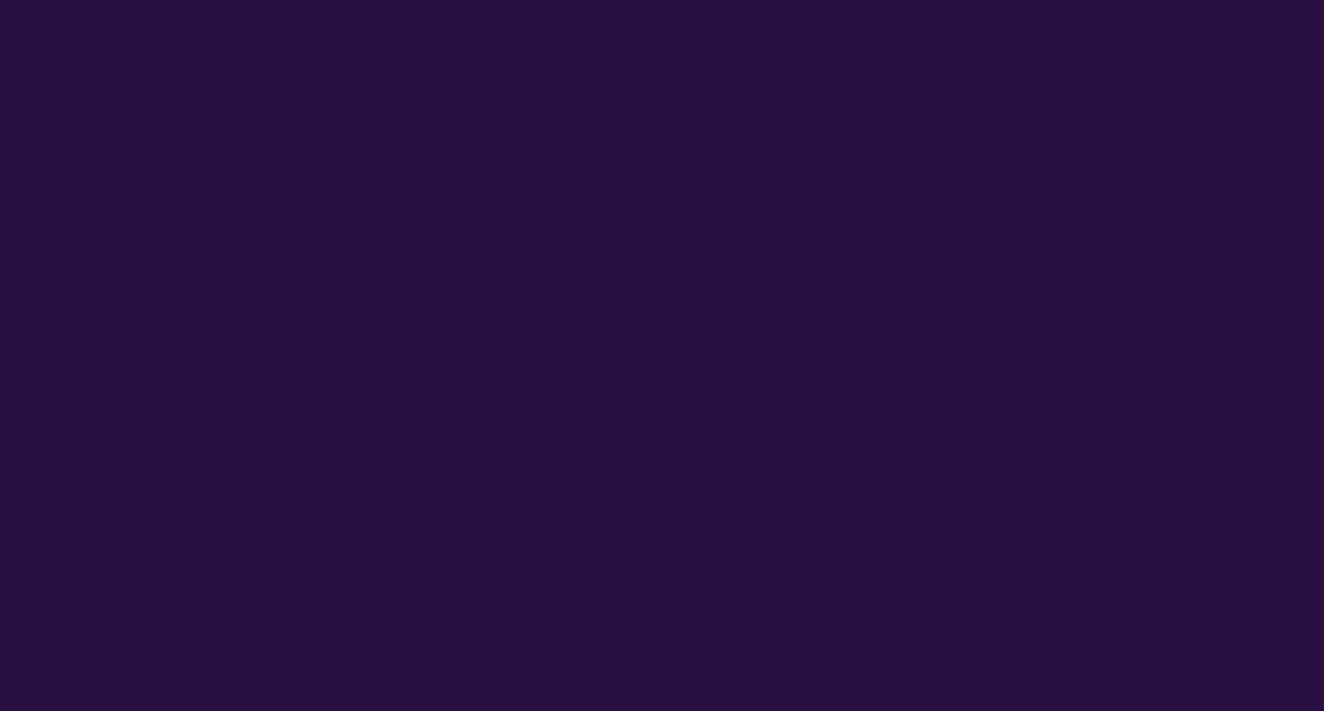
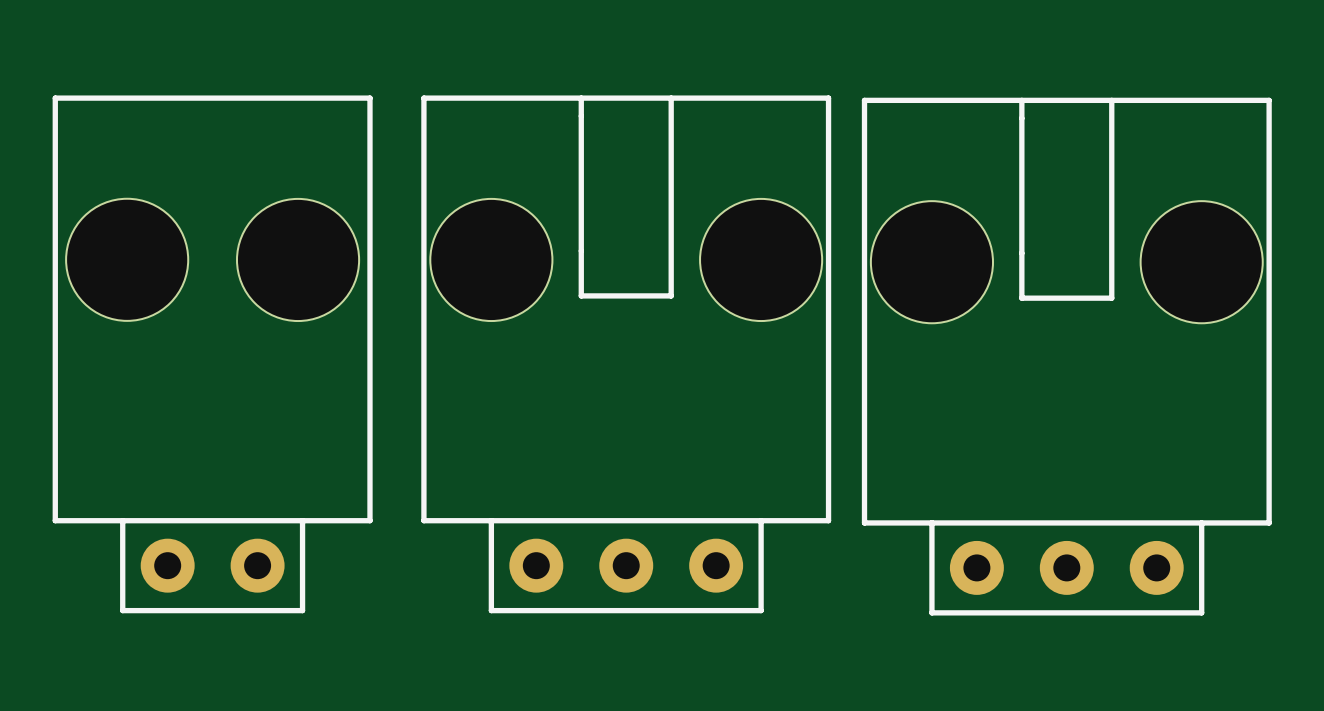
part: none -> (212, 354)
part: none -> (626, 354)
part: none -> (1066, 356)

